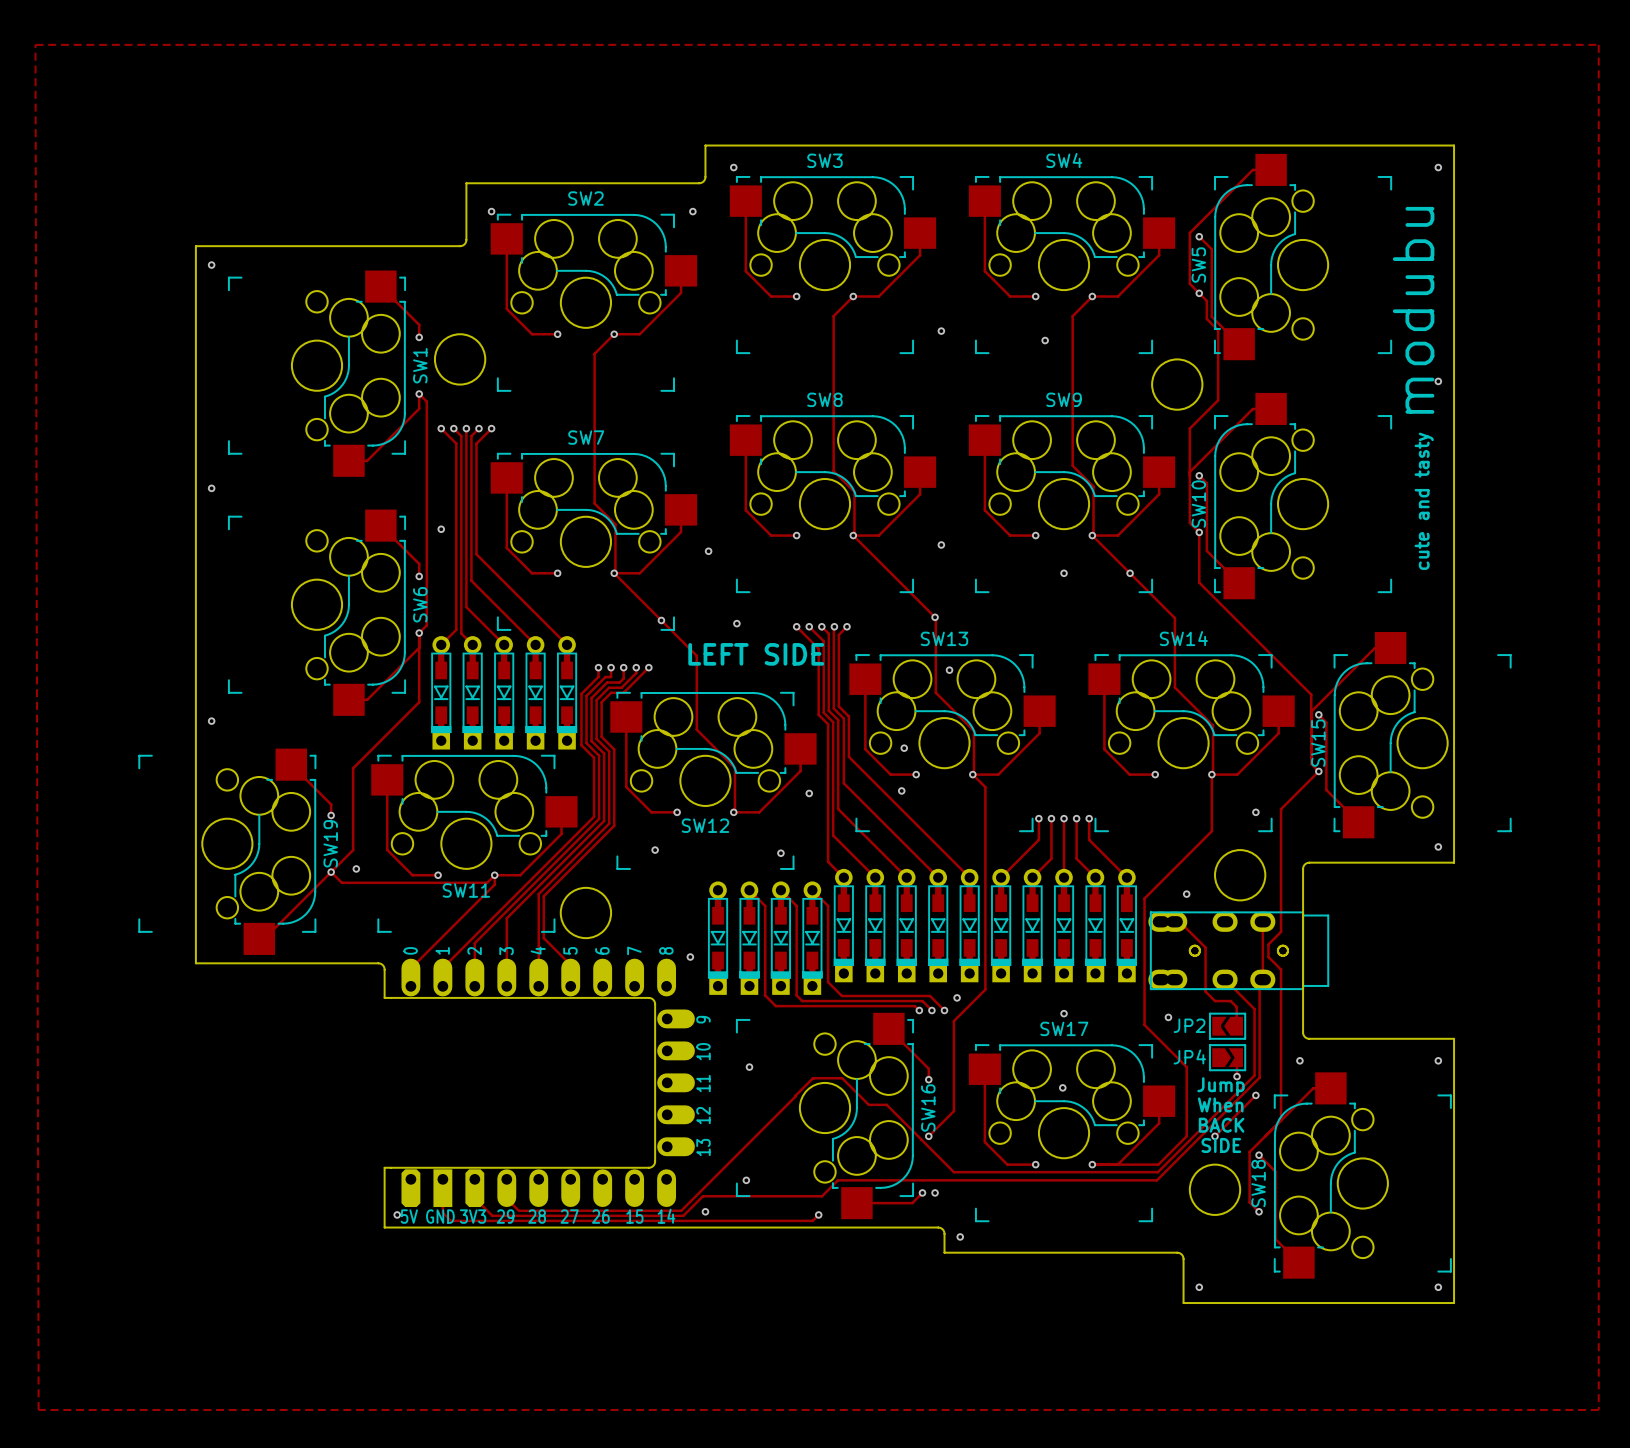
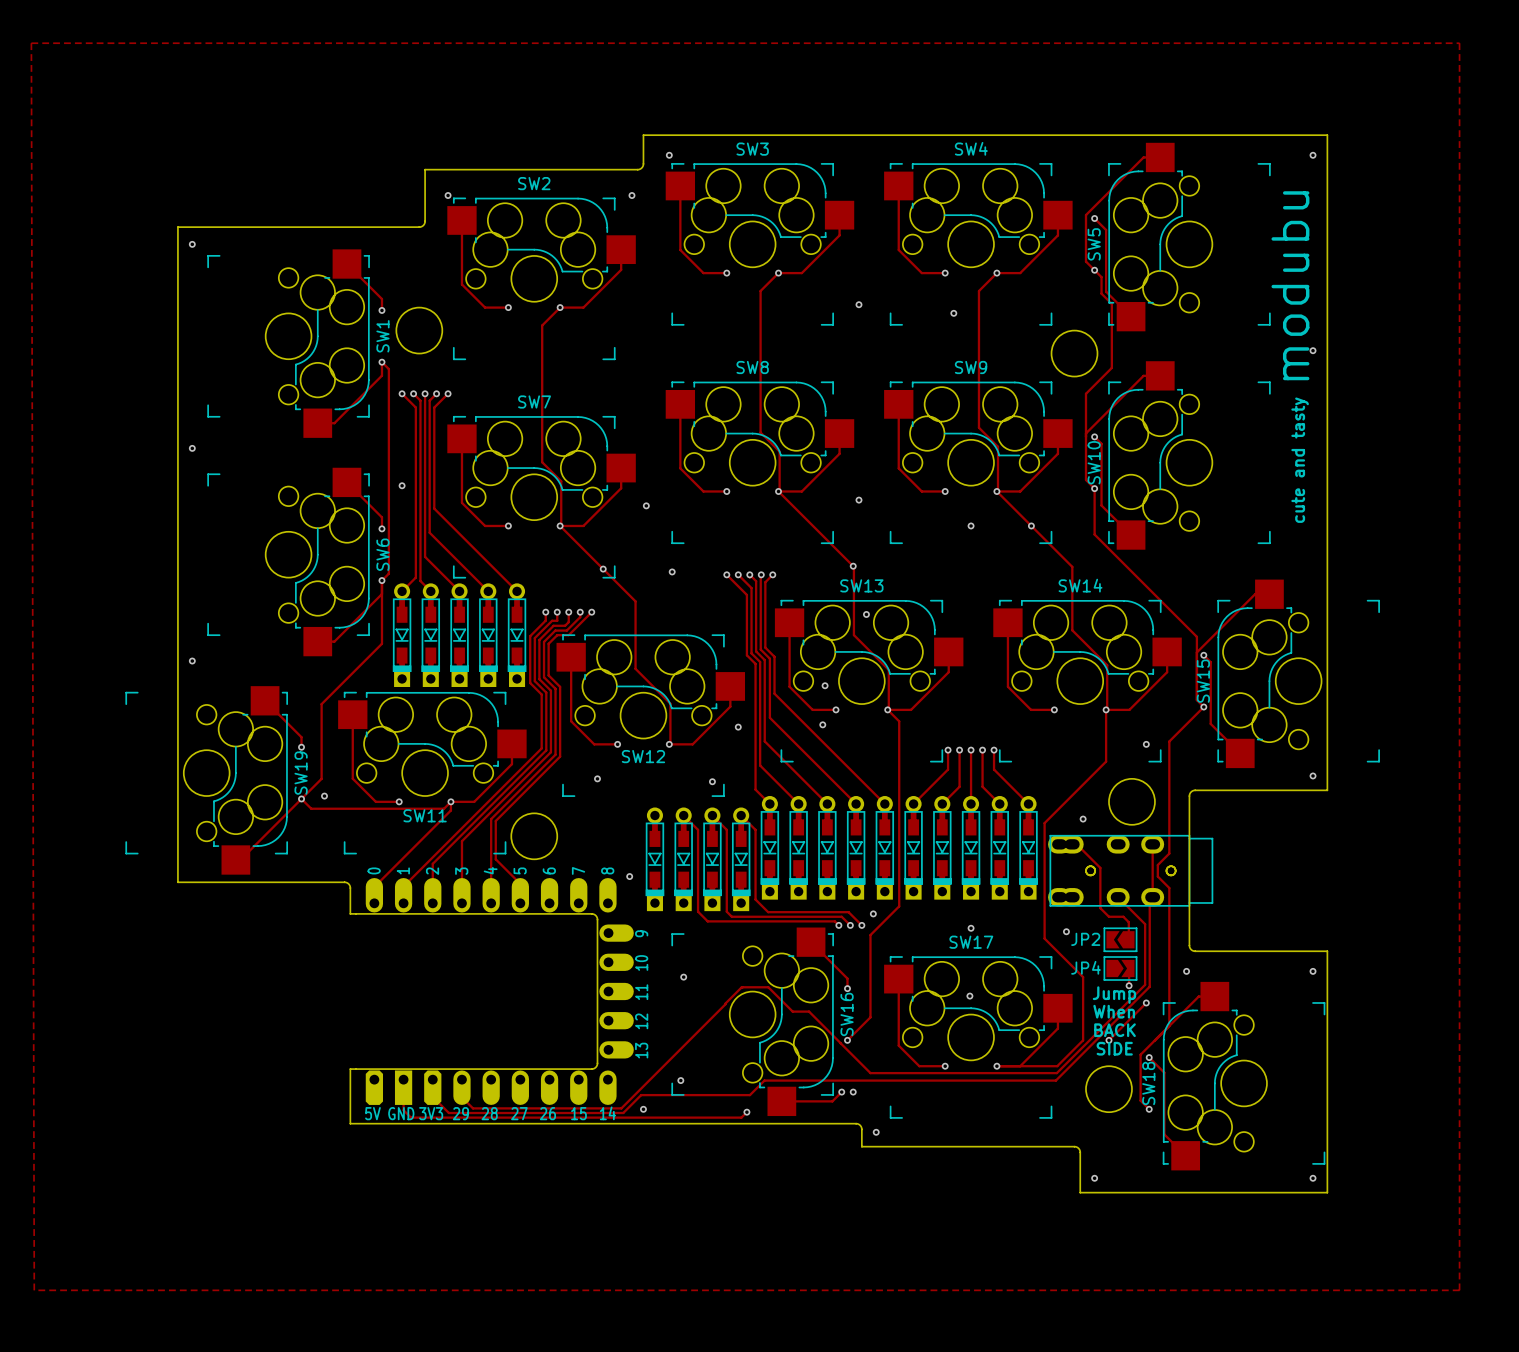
text: LEFT SIDE (756, 654) -> none
via: (397, 1214) -> none

